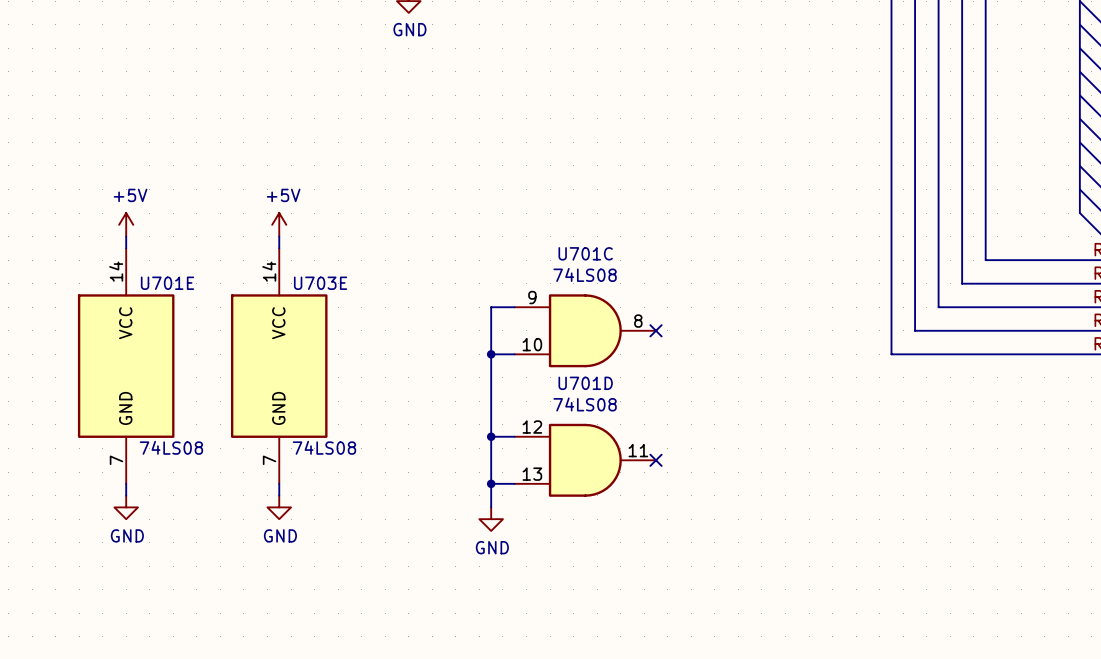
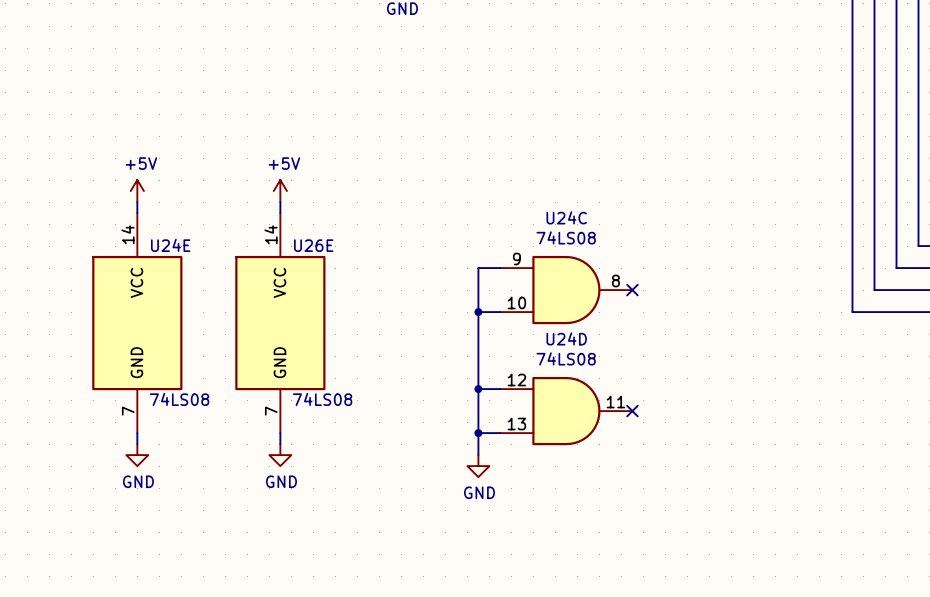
U701C name: U701C (585, 253) -> U24C (566, 217)
U701E name: U701E (167, 283) -> U24E (170, 245)
U703E name: U703E (320, 283) -> U26E (313, 245)
U701D name: U701D (585, 383) -> U24D (566, 338)

